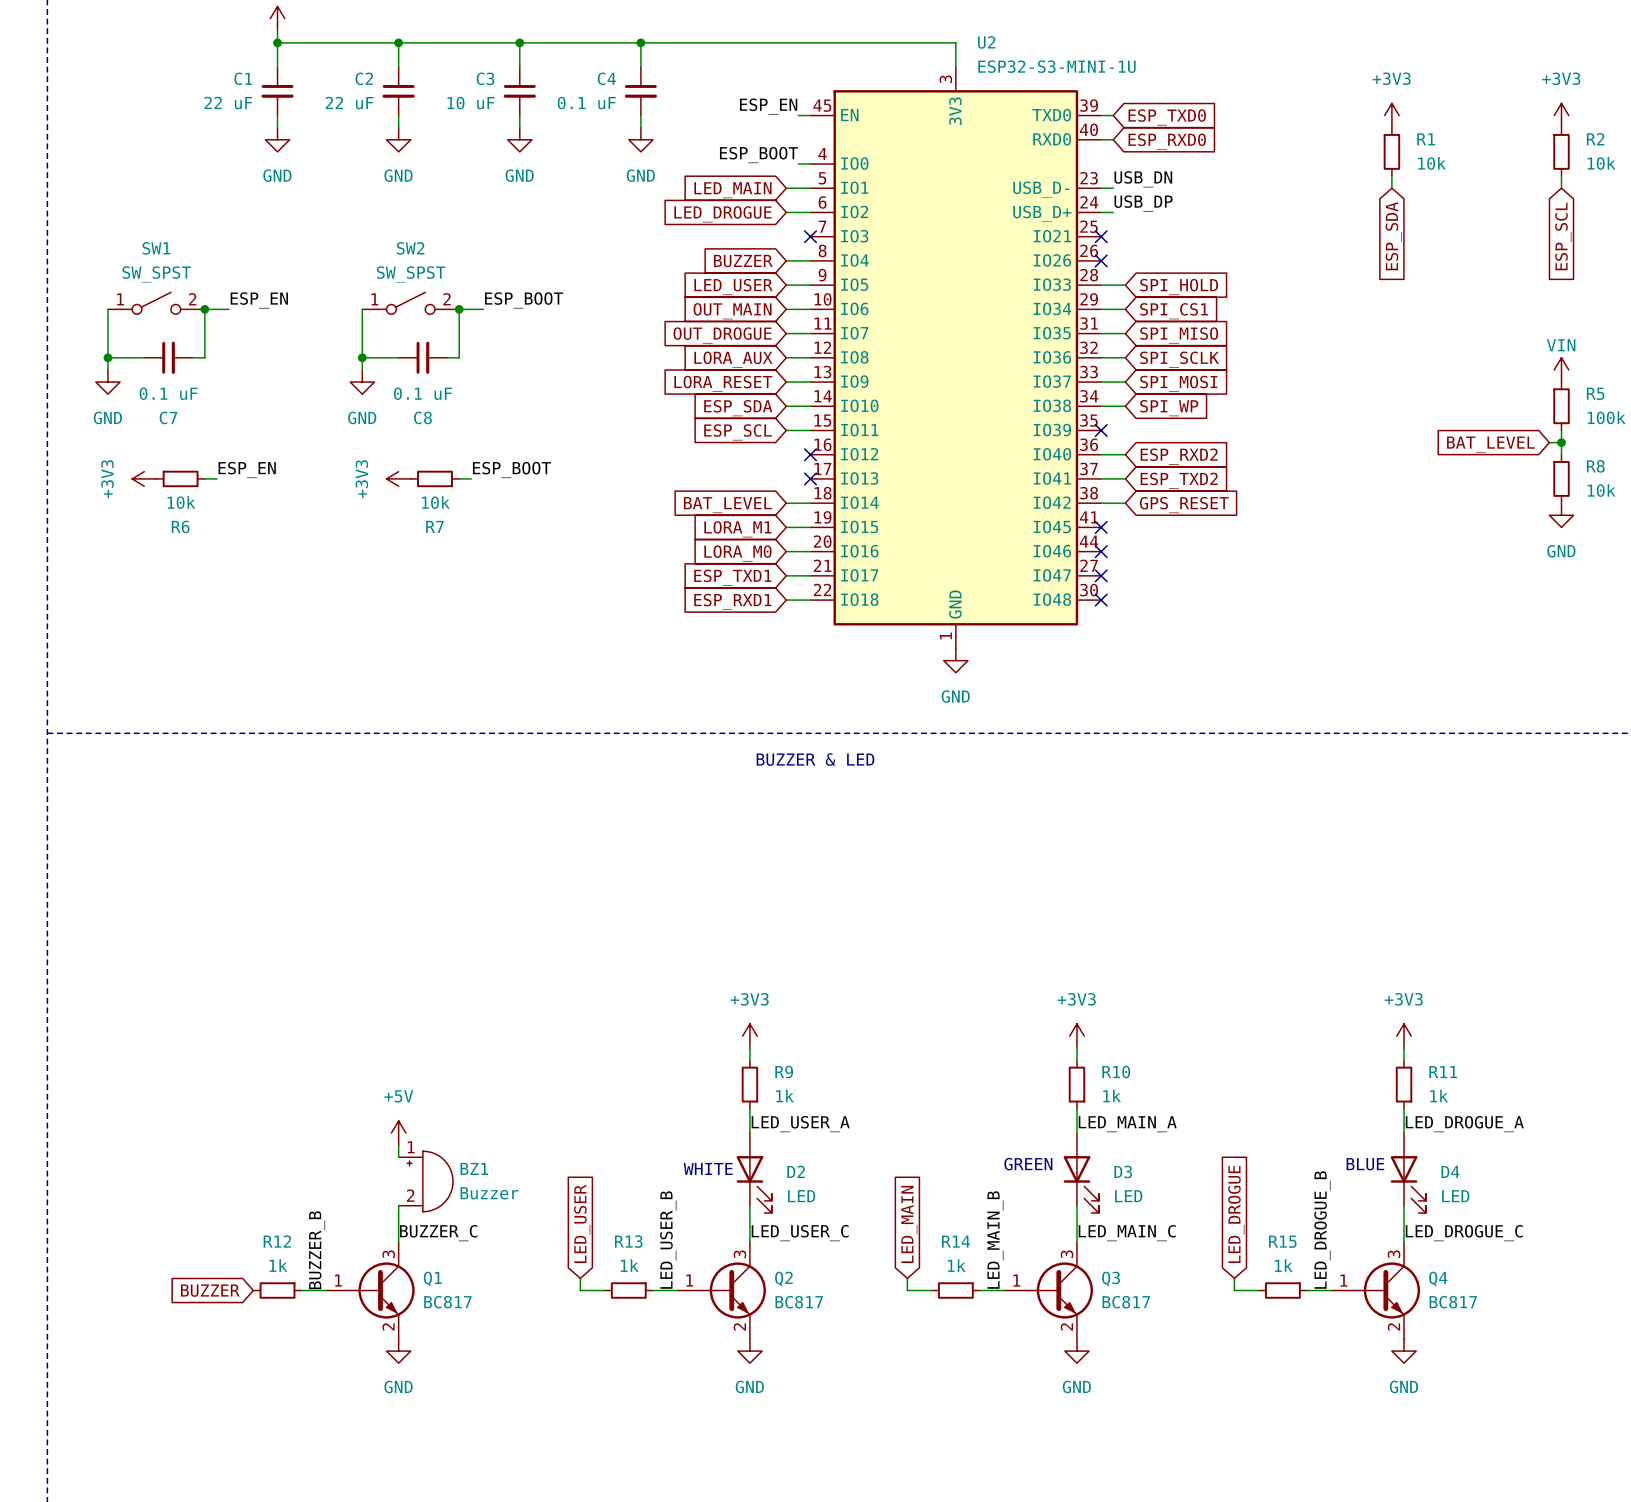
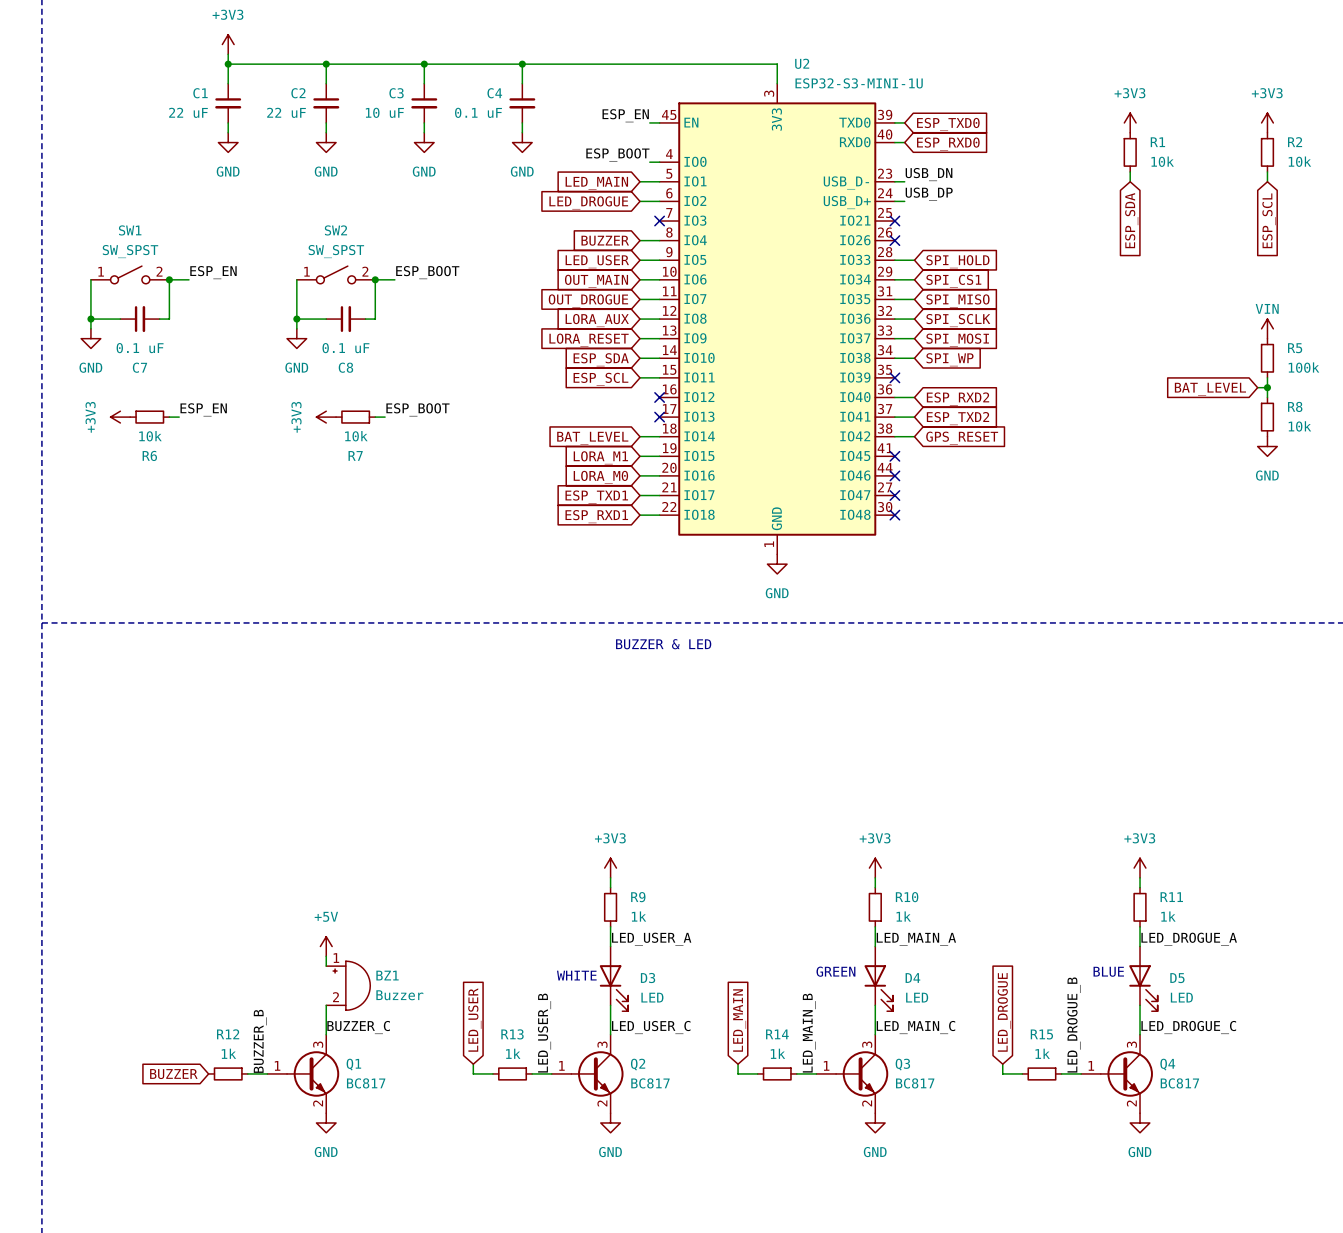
D2 name: D2 (796, 1171) -> D3 (648, 978)
D3 name: D3 (1123, 1171) -> D4 (912, 978)
D4 name: D4 (1450, 1171) -> D5 (1177, 978)

